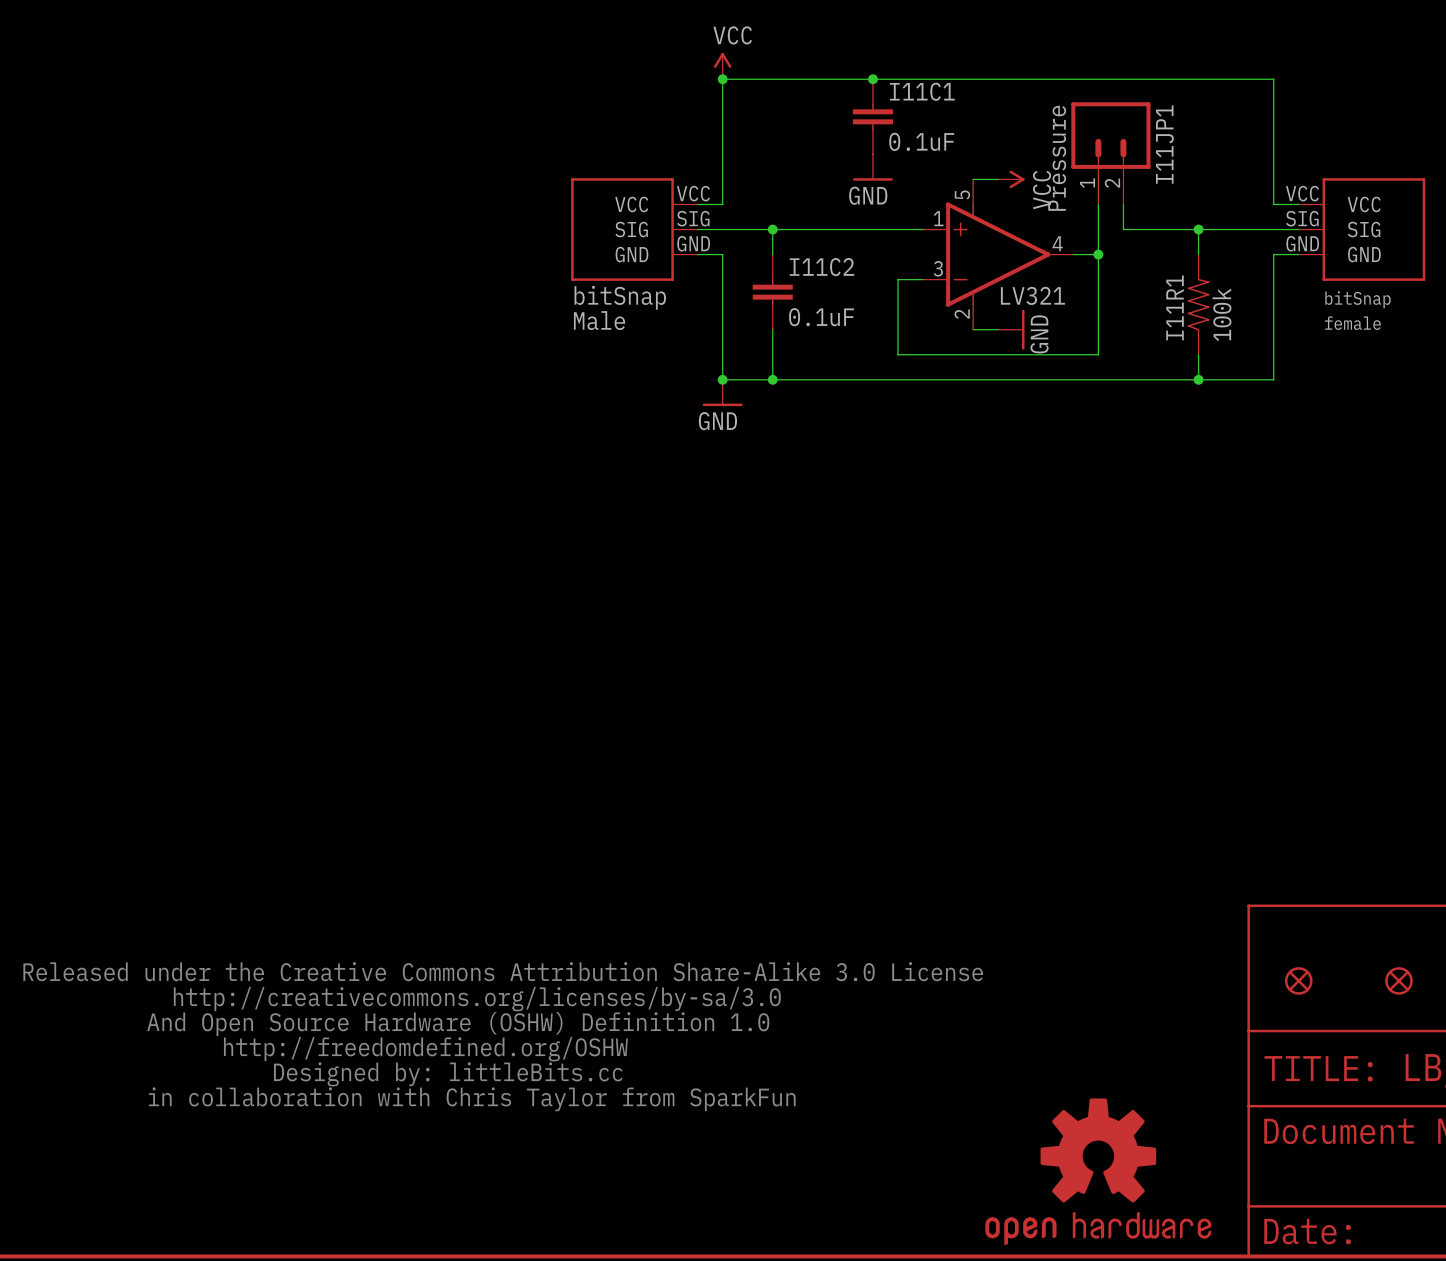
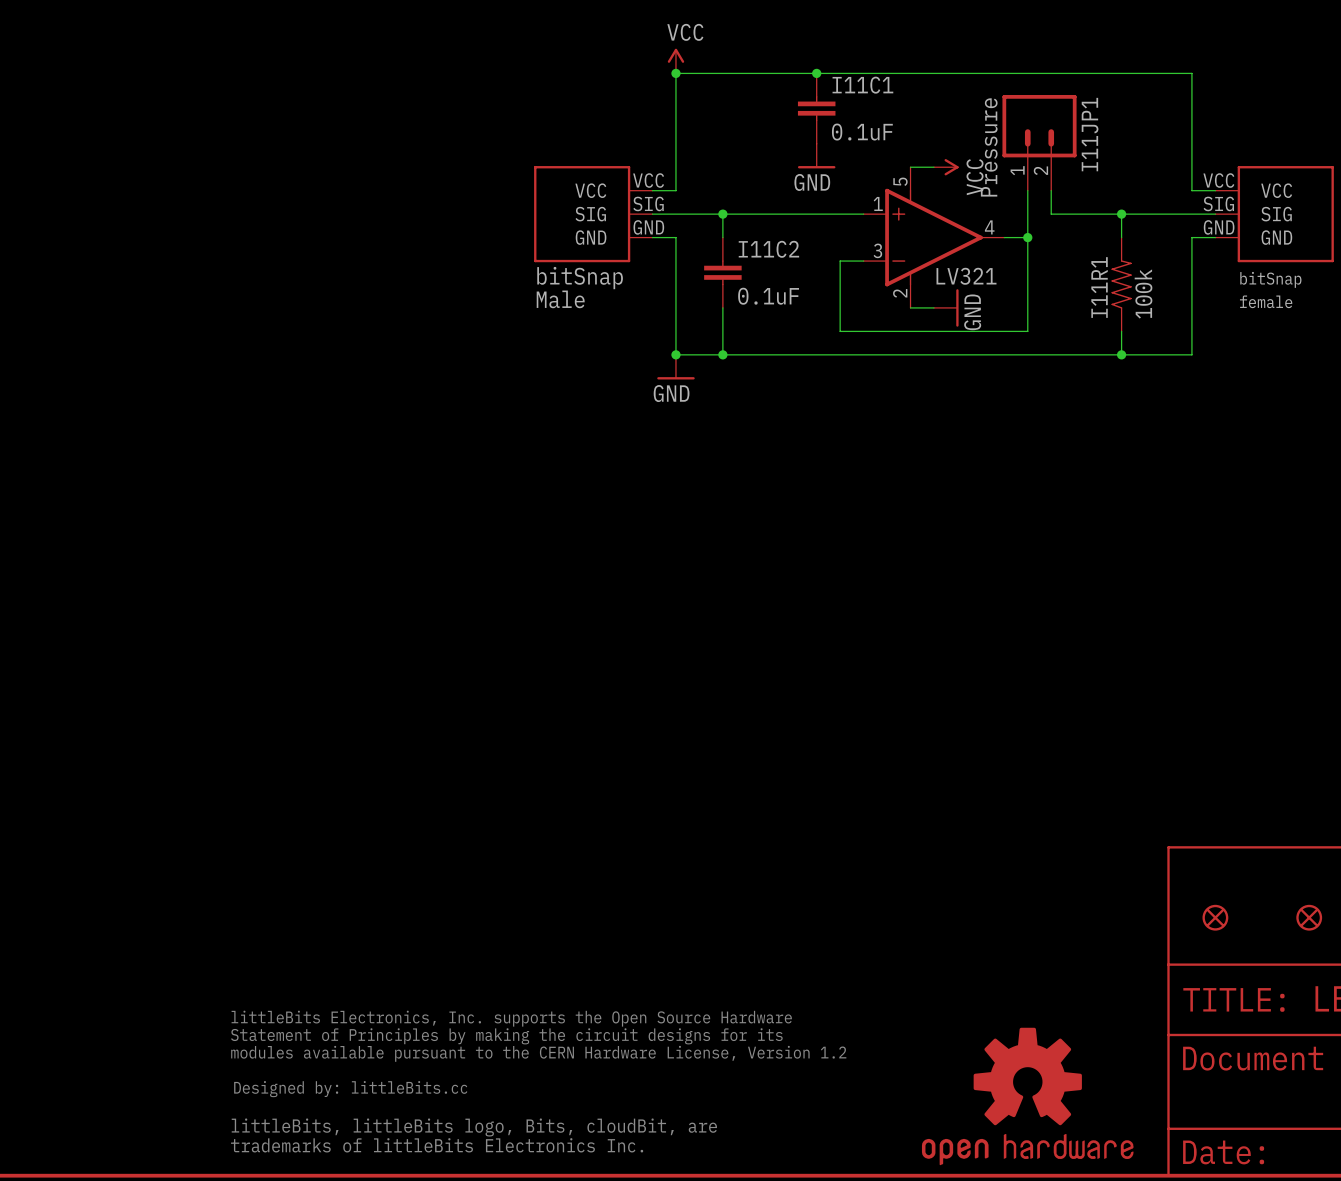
part: (503, 1036) -> none
part: none -> (538, 1081)

